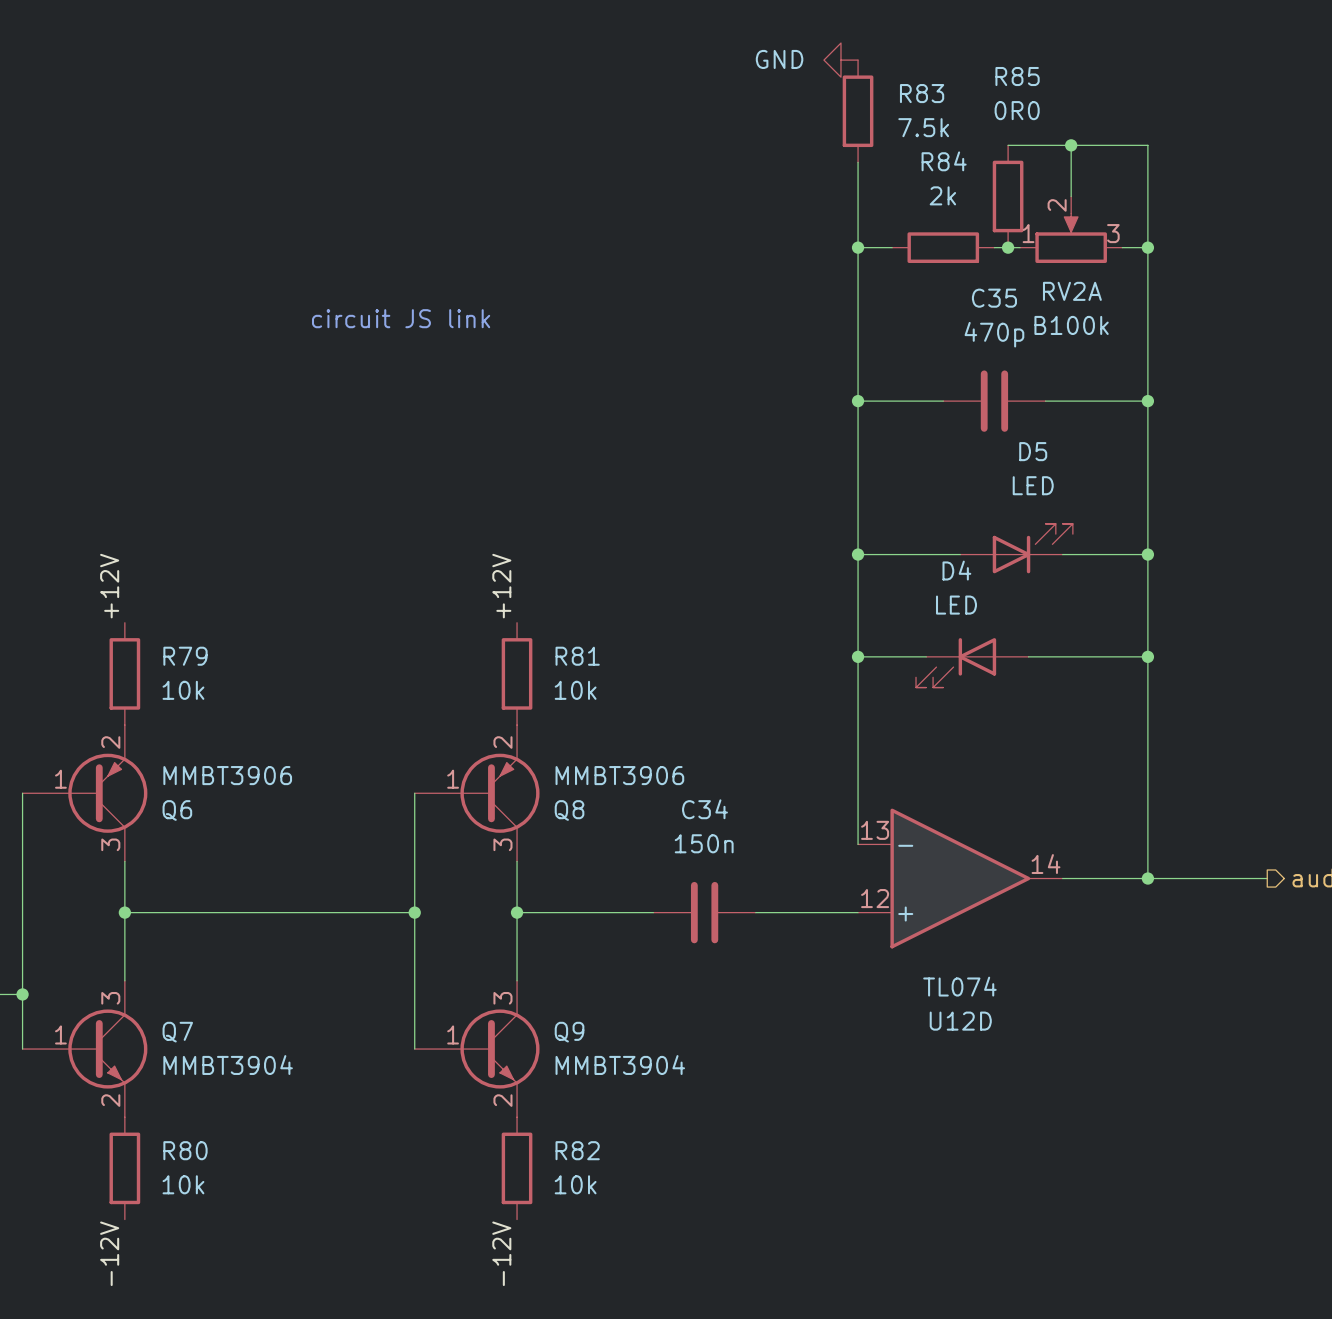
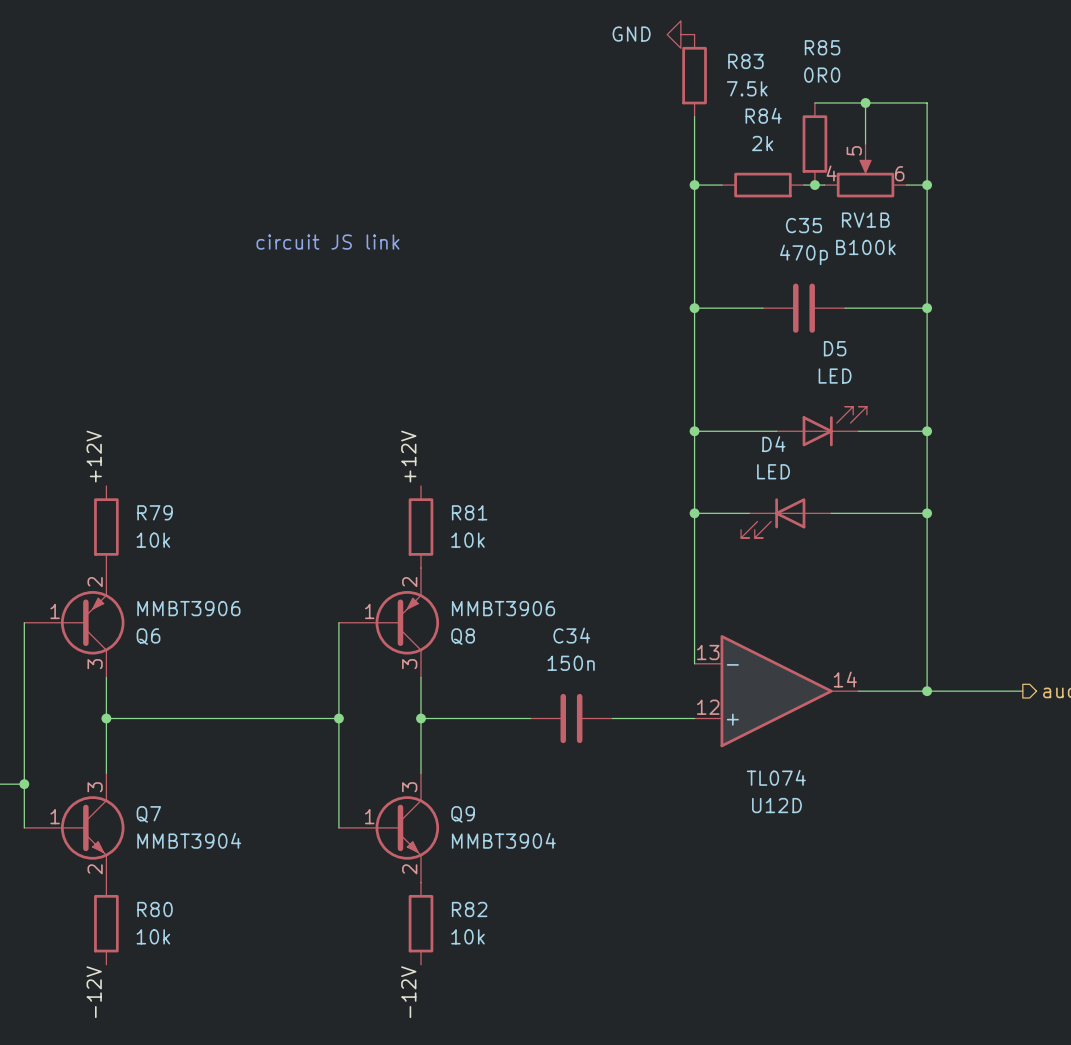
RV2A pin number: 2 (1057, 205) -> 5 (854, 150)
RV2A pin number: 1 (1028, 233) -> 4 (831, 173)
RV2A pin number: 3 (1113, 233) -> 6 (899, 173)
RV2A name: RV2A (1072, 291) -> RV1B (865, 220)

